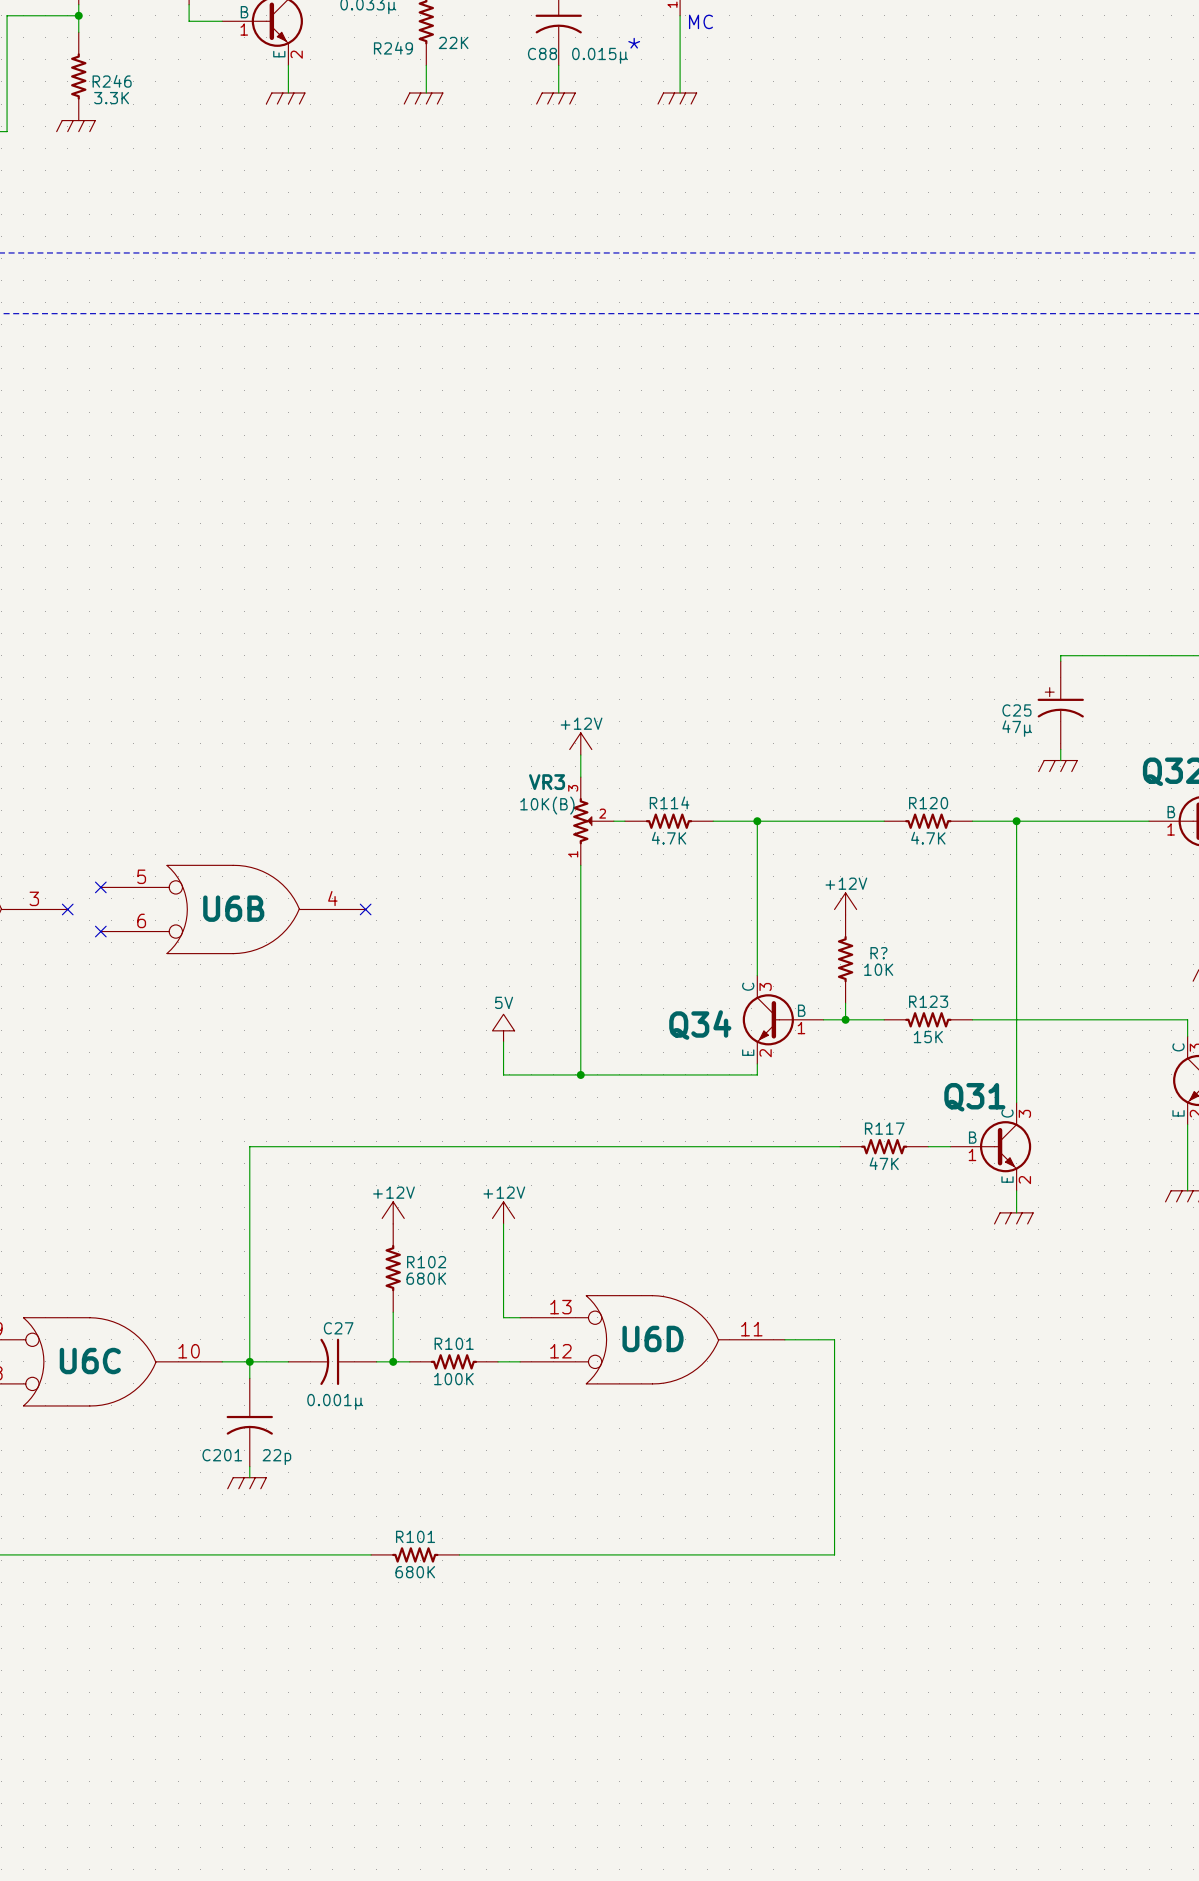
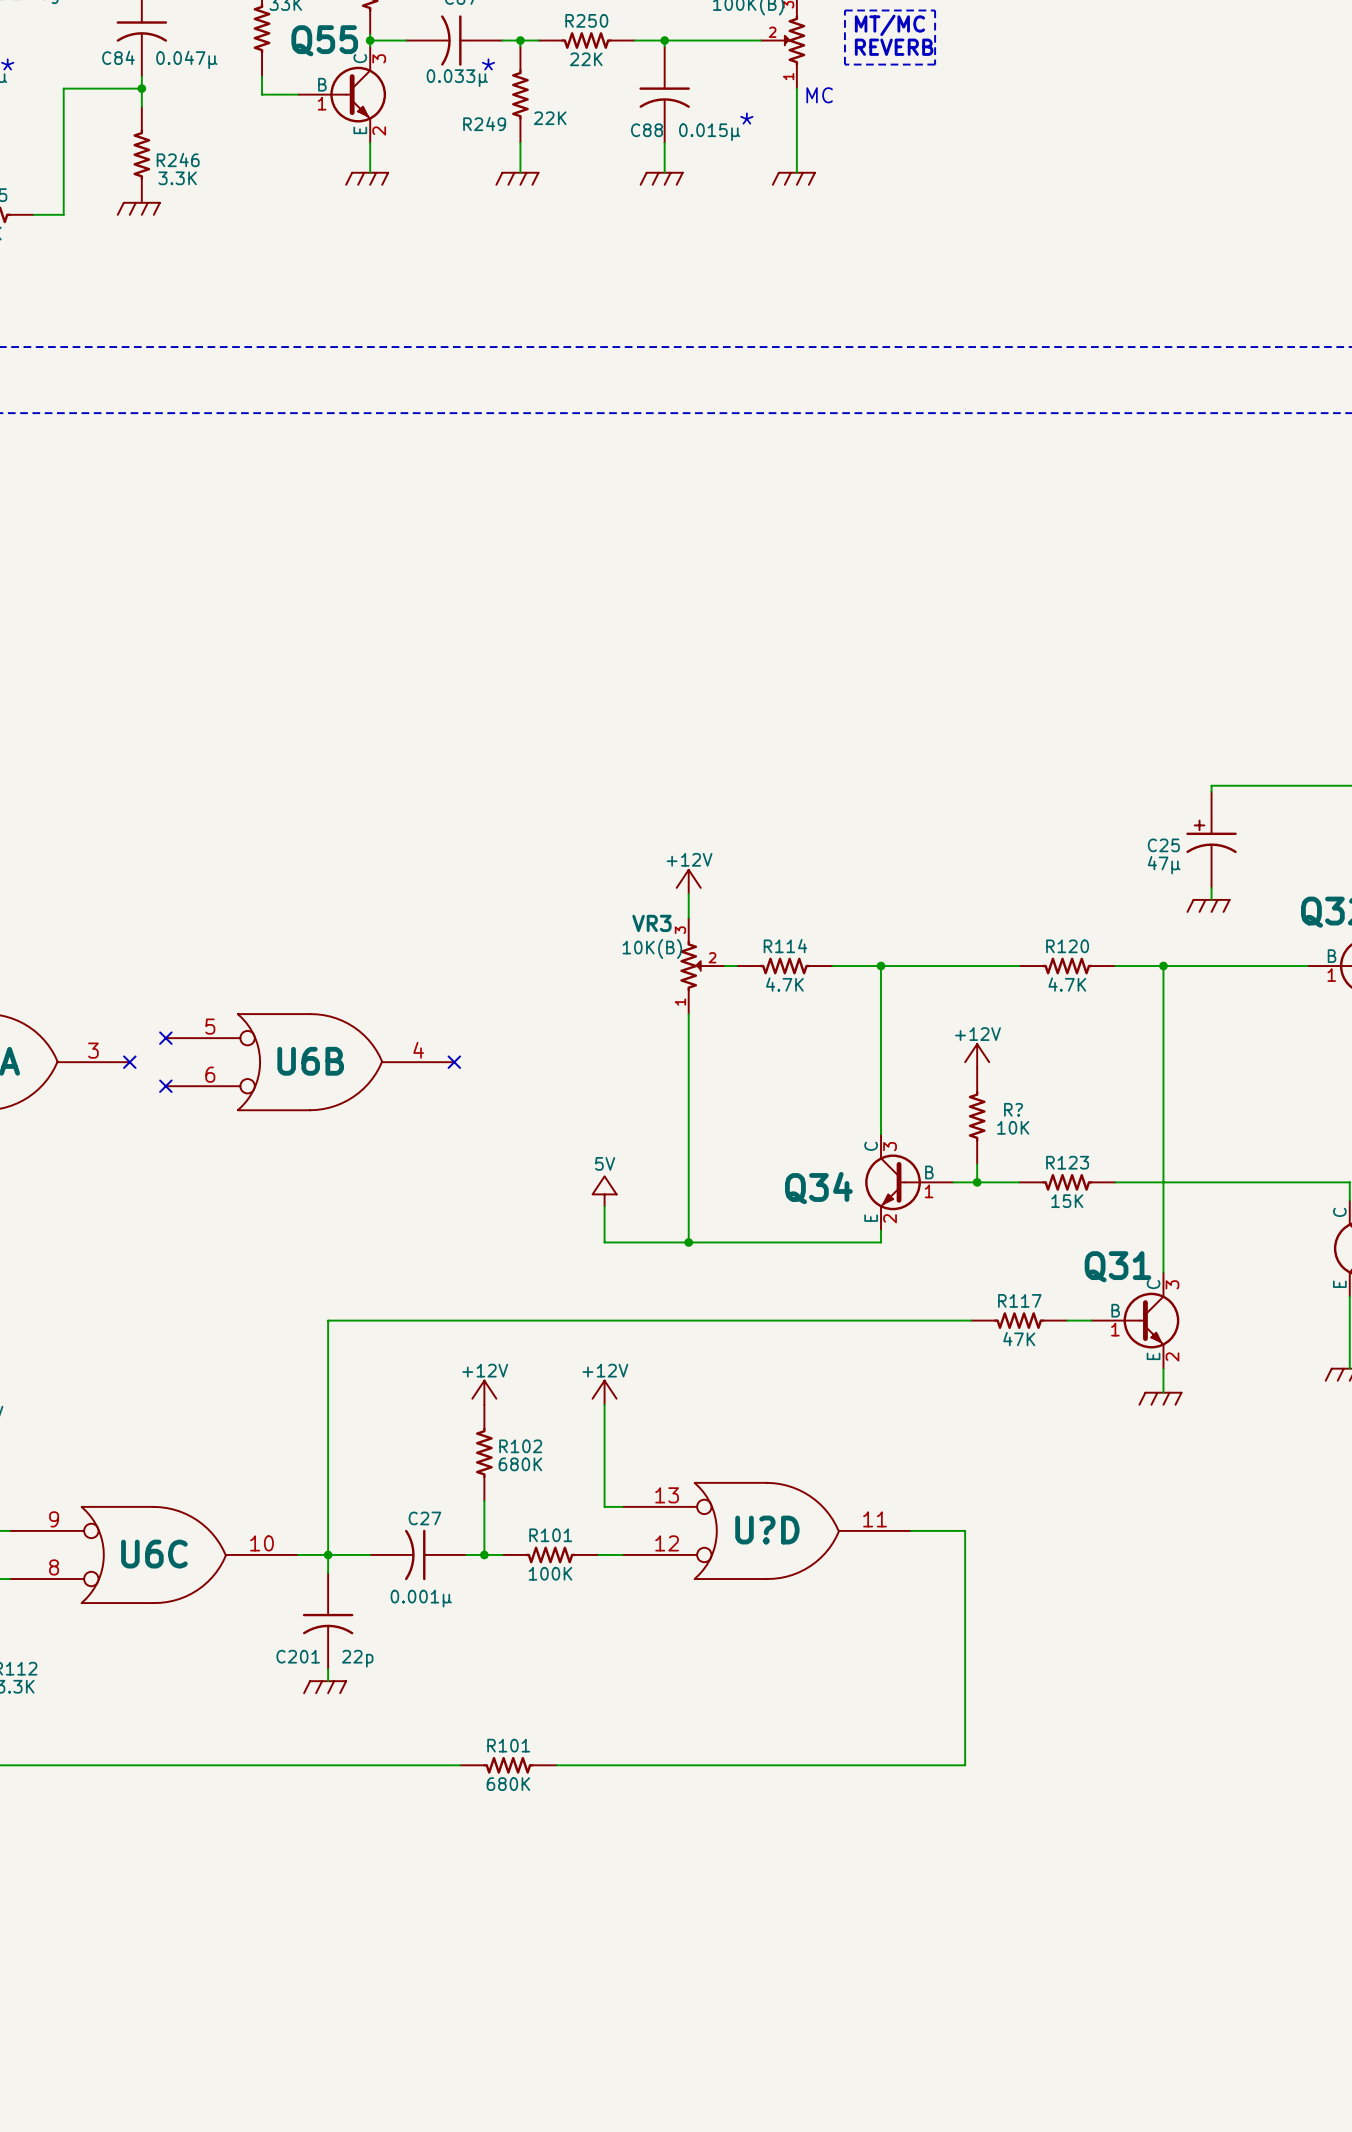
U6D name: U6D (653, 1338) -> U?D (767, 1530)

